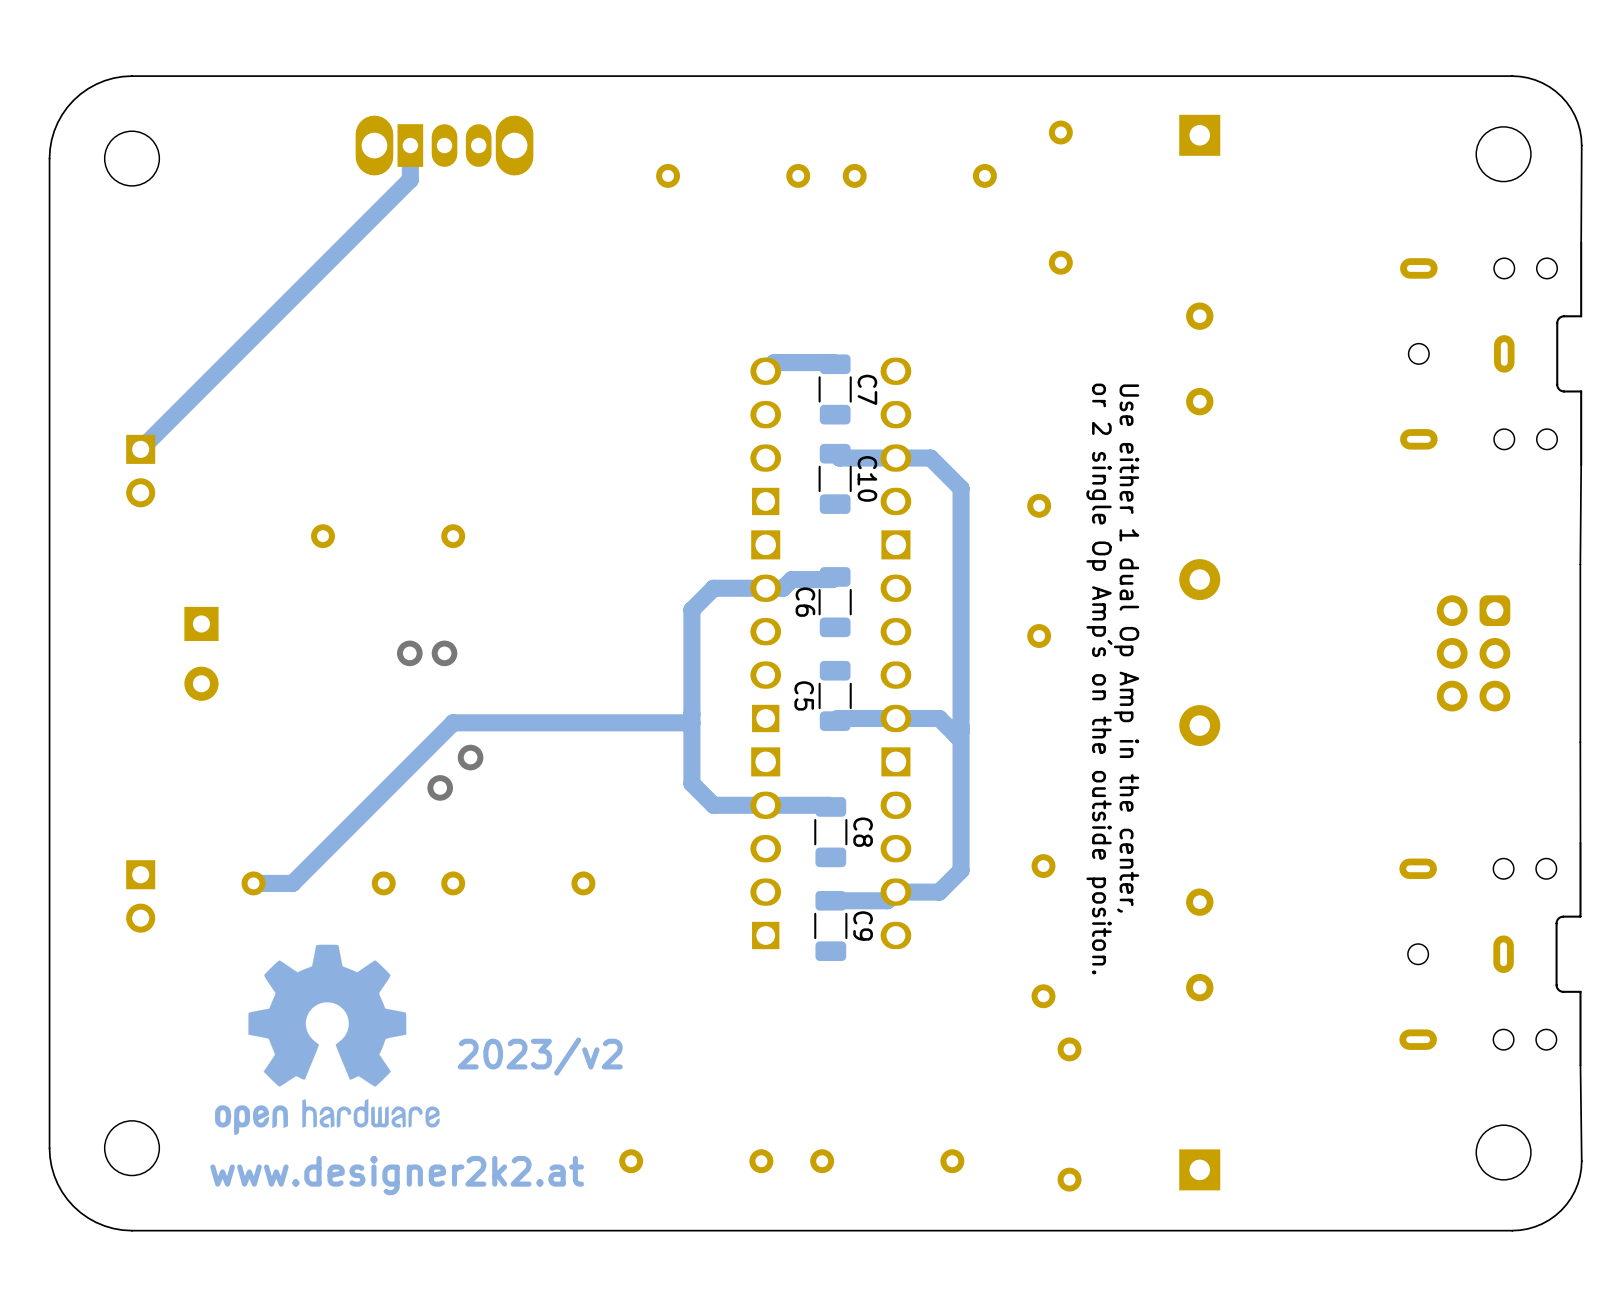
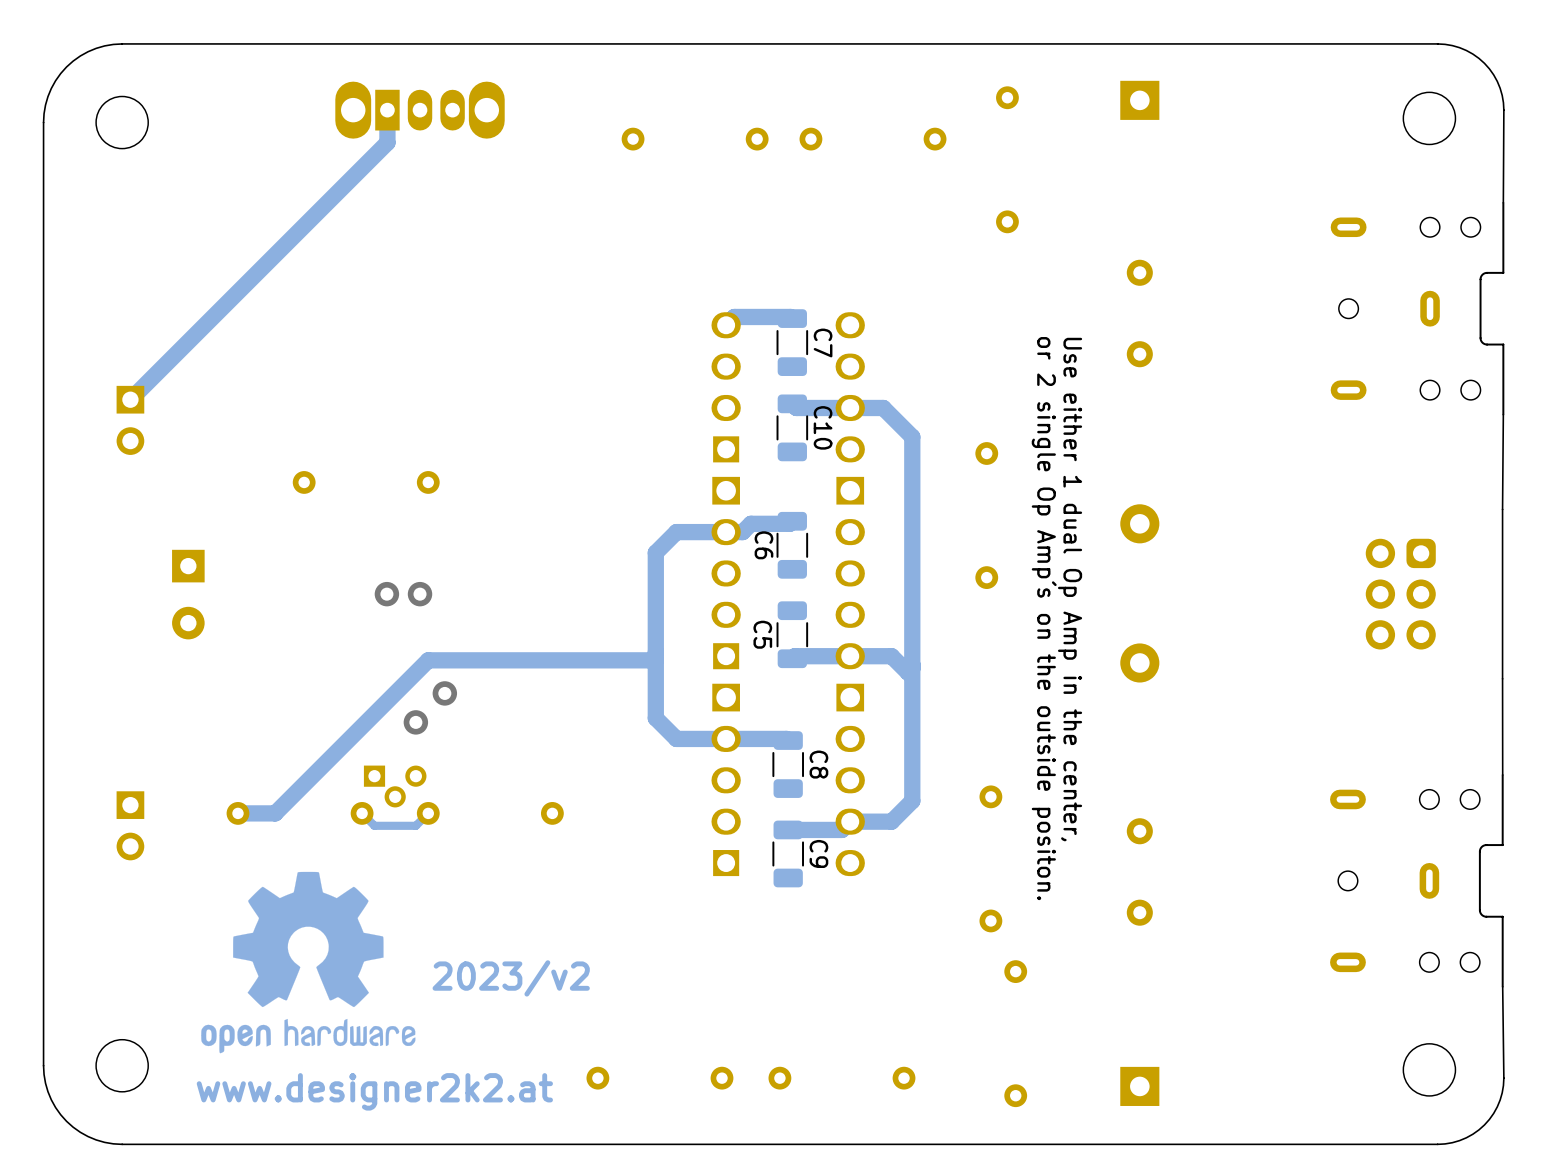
part: none -> (395, 786)
track: none -> (428, 813) (415, 825) (374, 825) (362, 813)

